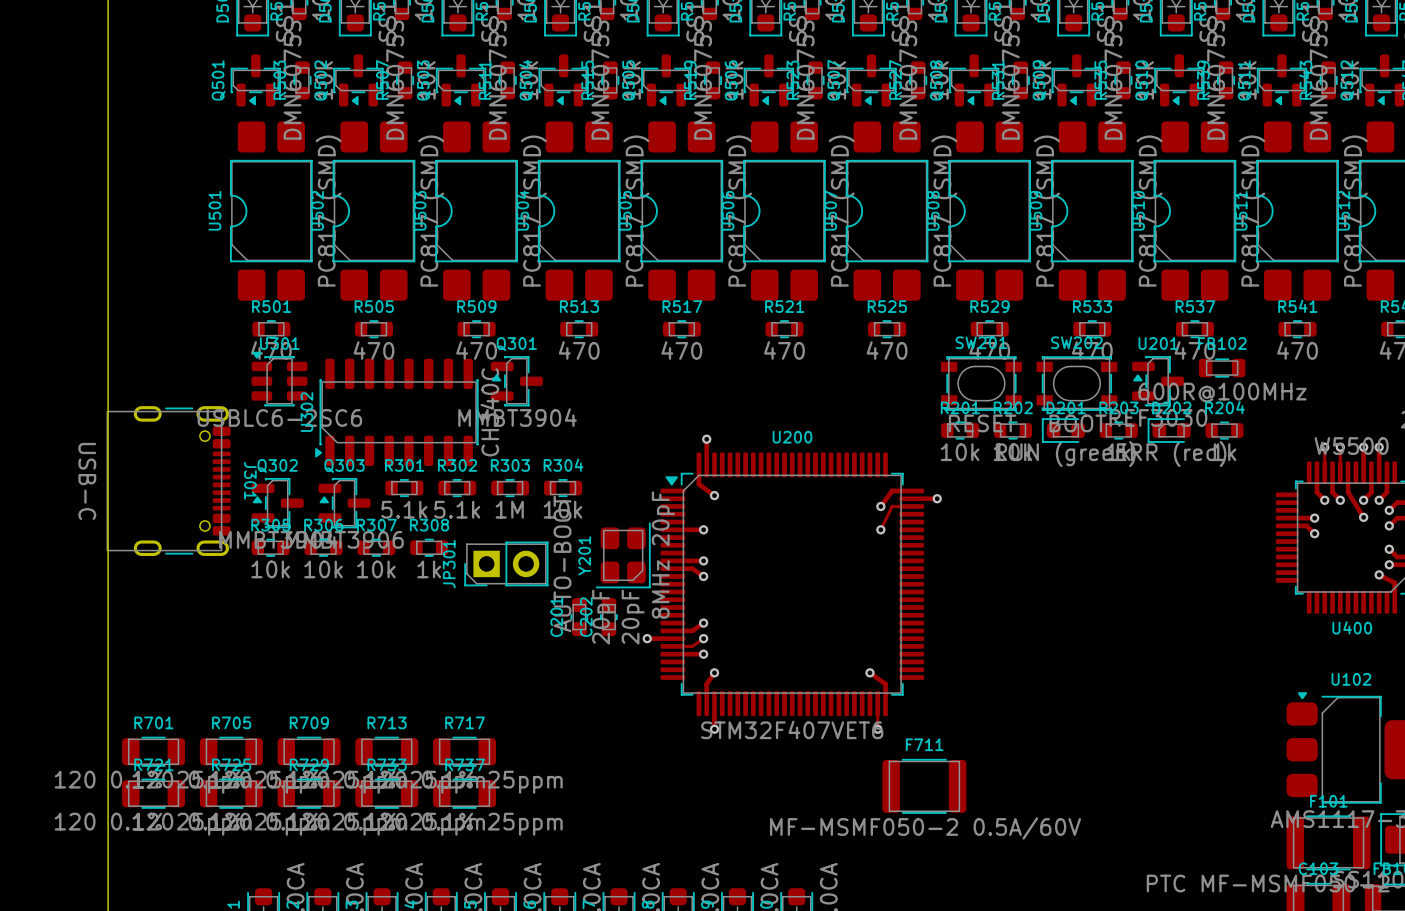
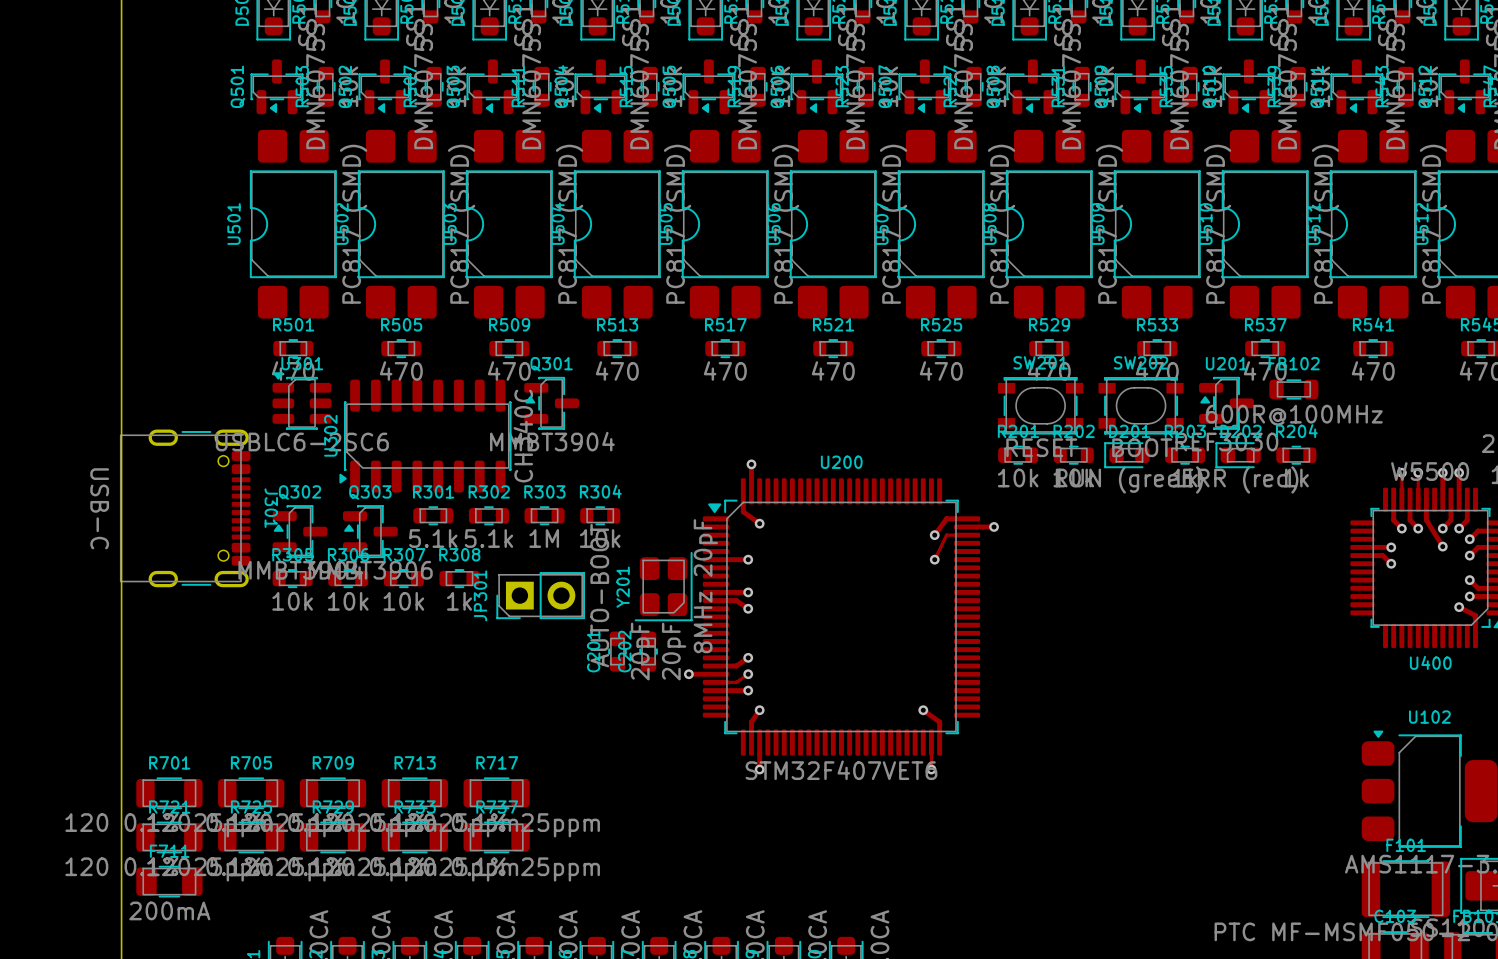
F711 footprint: [882, 758, 967, 814] -> [136, 865, 203, 898]
F711 value: MF-MSMF050-2 0.5A/60V (925, 828) -> 200mA (169, 910)

